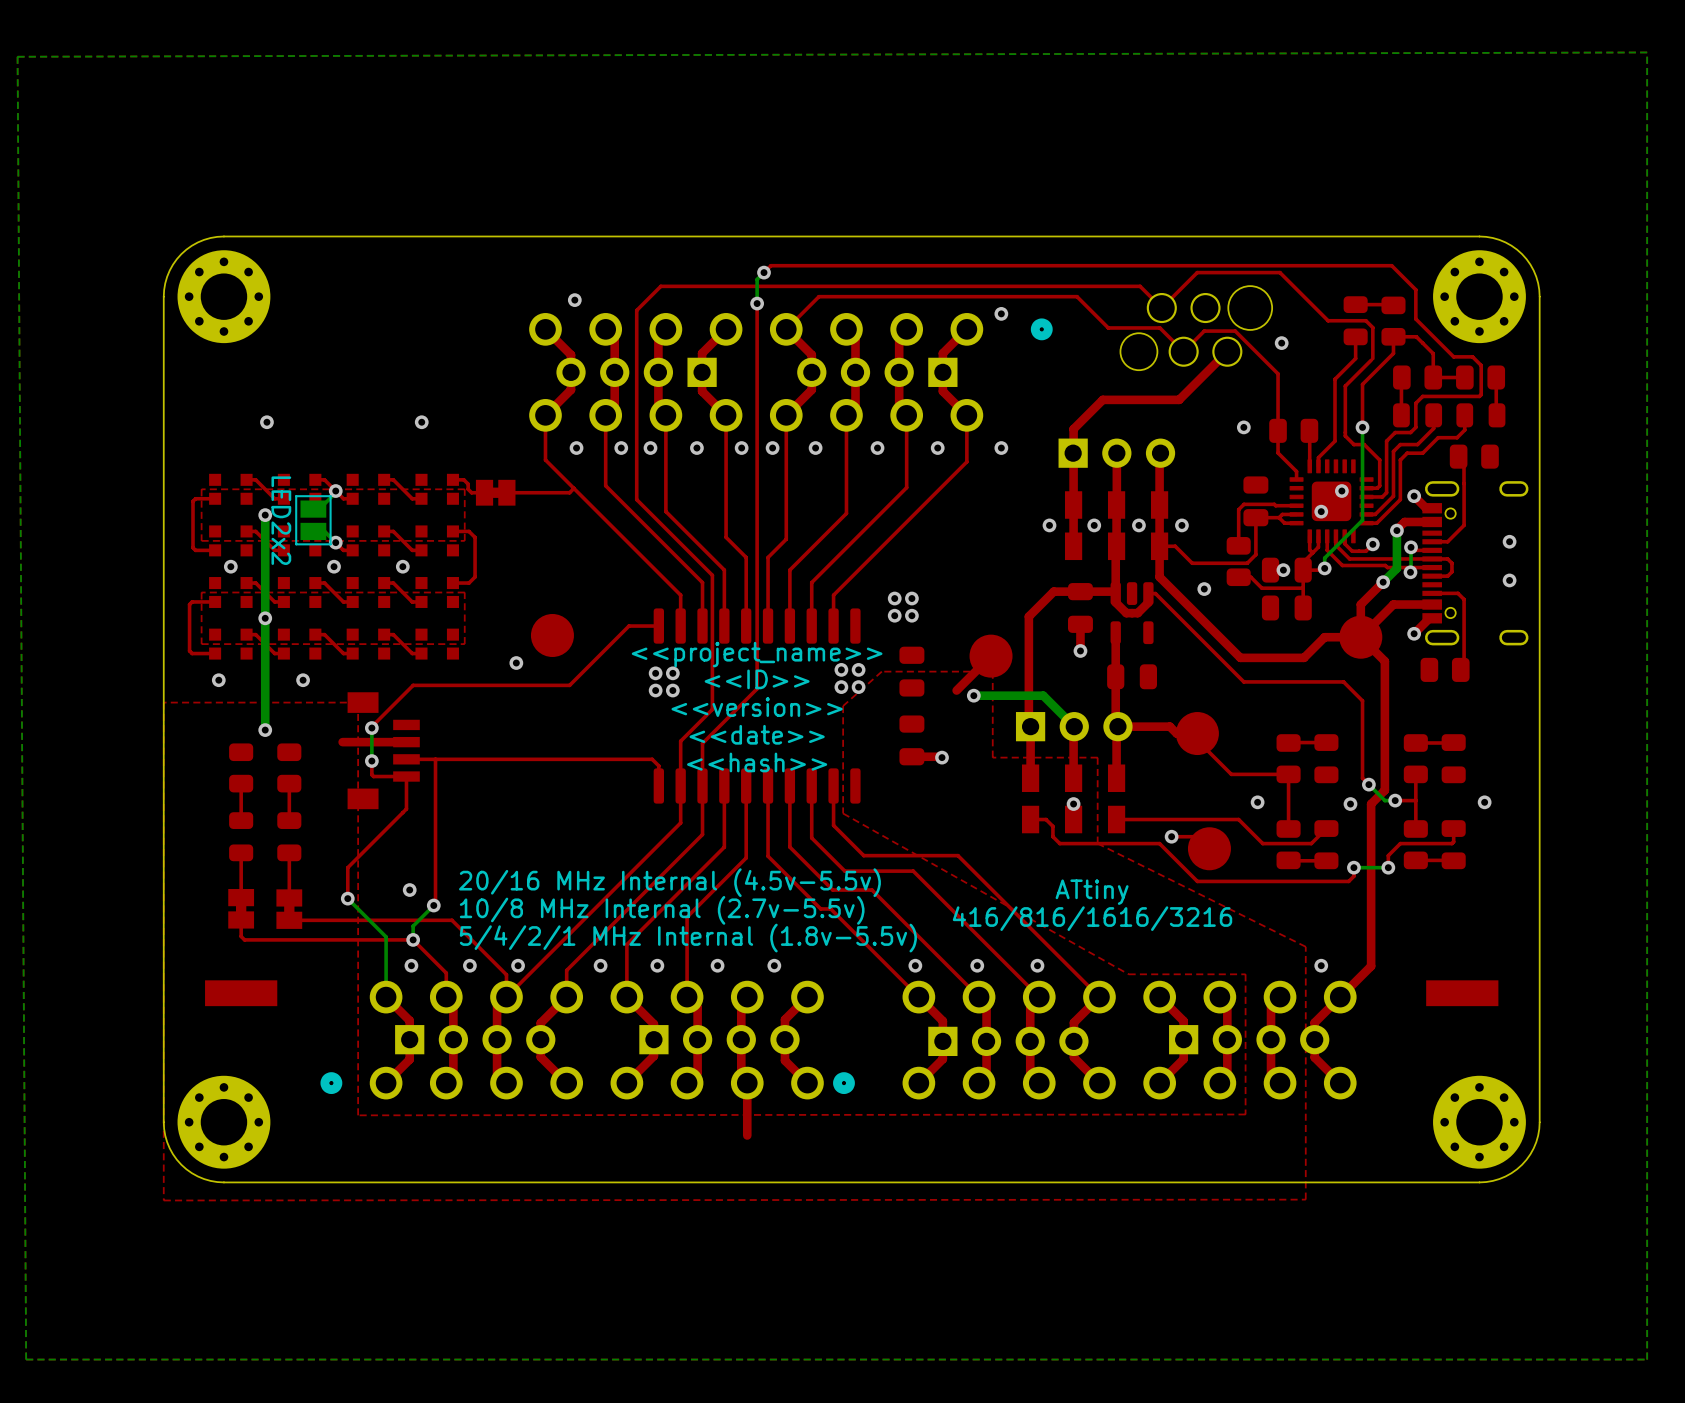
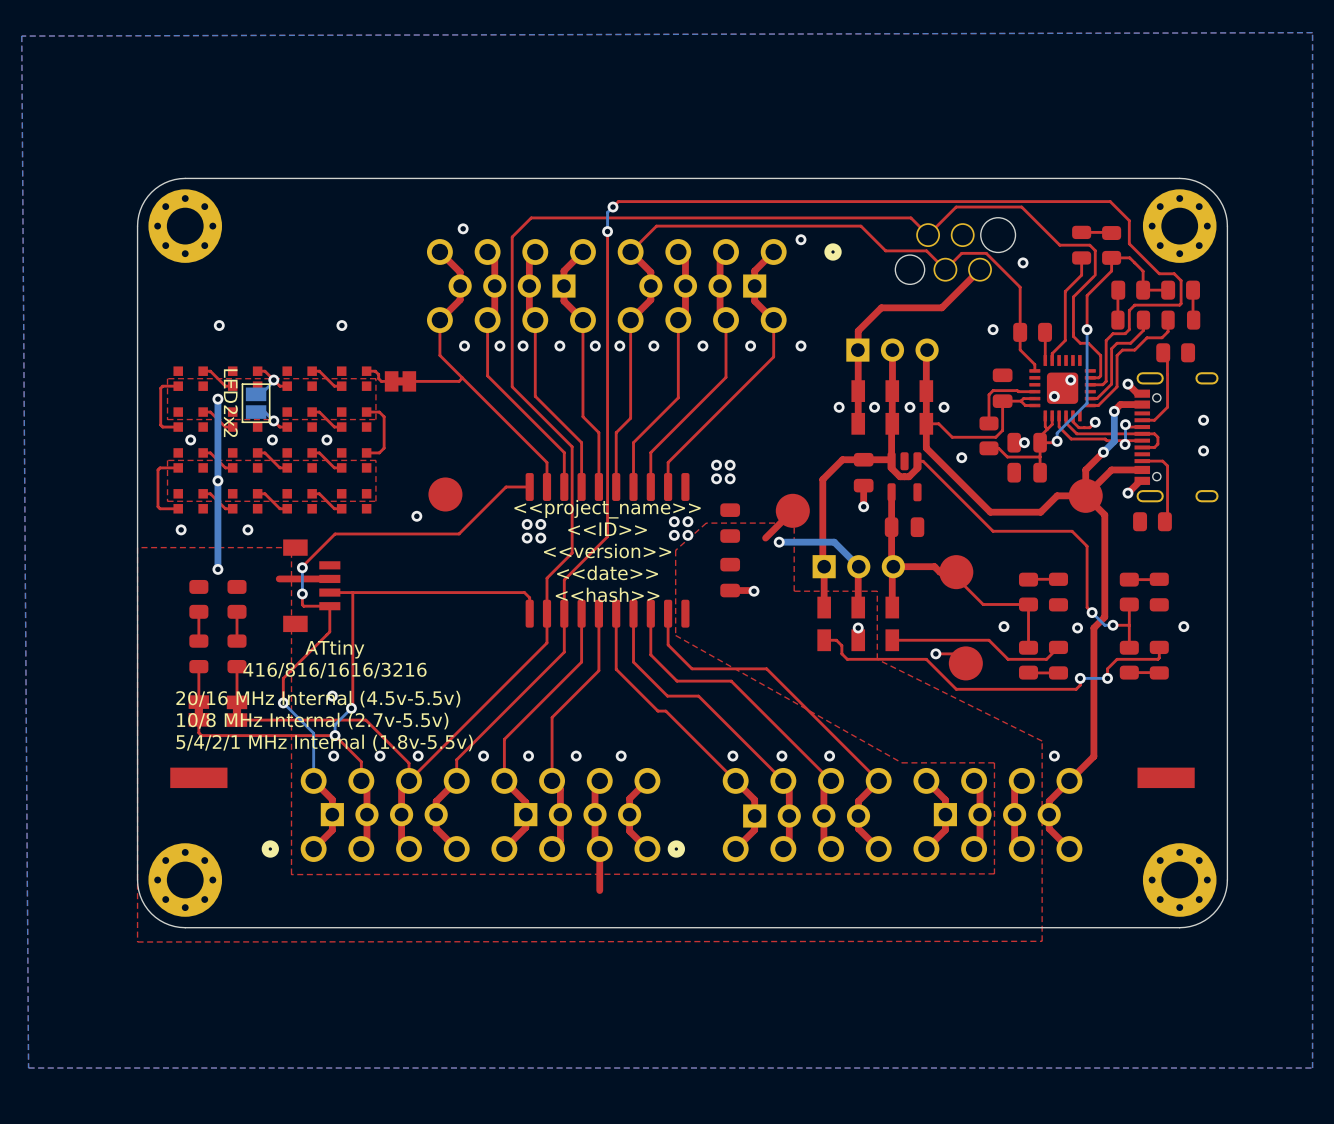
text: none -> ATtiny (334, 649)
text: none -> 416/816/1616/3216 (334, 670)
text position: 20/16 MHz Internal (4.5v-5.5v) (669, 882) -> 20/16 MHz Internal (4.5v-5.5v) (318, 699)
text: ATtiny (1092, 892) -> none
text position: 10/8 MHz Internal (2.7v-5.5v) (662, 910) -> 10/8 MHz Internal (2.7v-5.5v) (312, 721)
text: 416/816/1616/3216 (1092, 918) -> none
text position: 5/4/2/1 MHz Internal (1.8v-5.5v) (688, 938) -> 5/4/2/1 MHz Internal (1.8v-5.5v) (324, 742)

